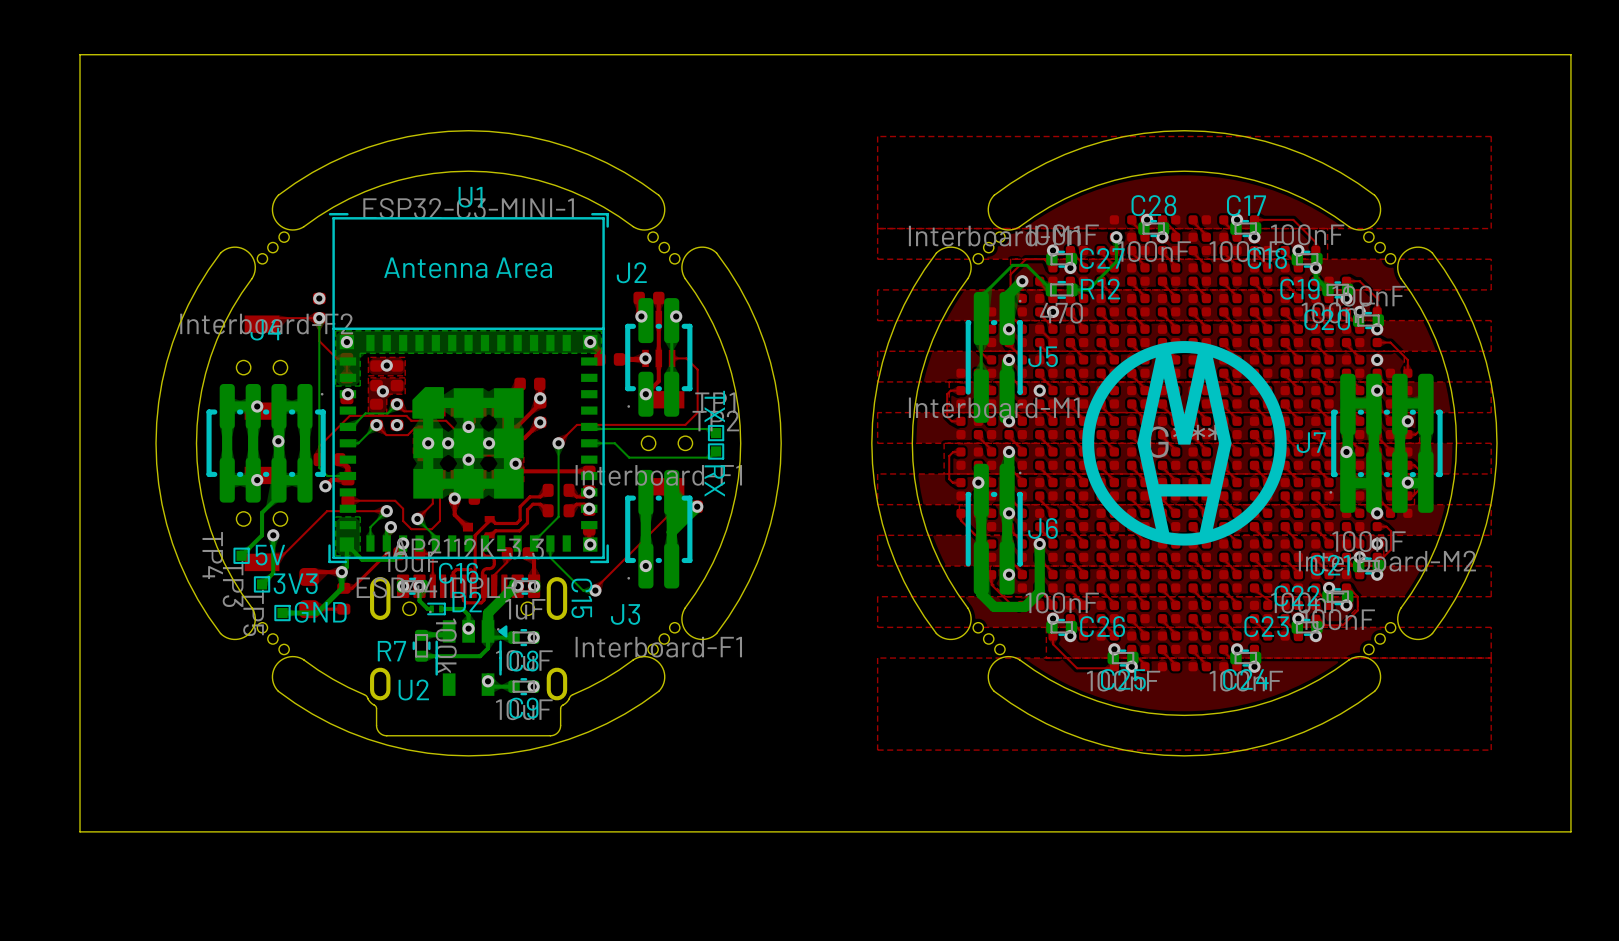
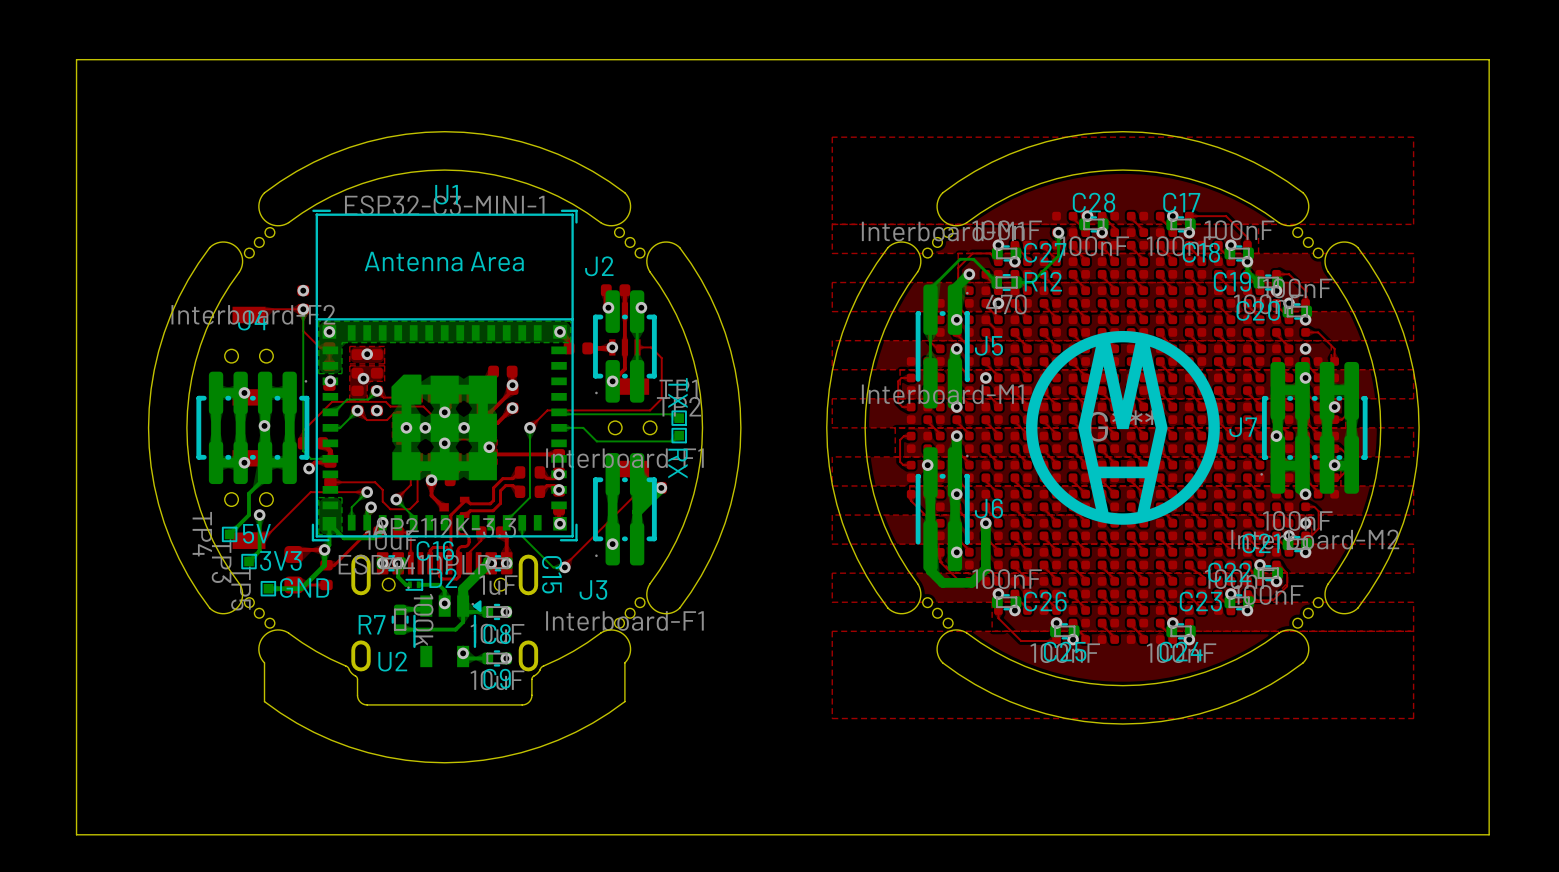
board edge: (658, 691) (606, 723) (569, 739) (509, 753) (468, 755) (407, 749) (368, 739) (312, 714) (278, 691) -> (624, 662) (624, 701) (592, 723) (557, 740) (521, 752) (483, 760) (444, 762) (406, 760) (368, 752) (331, 740) (296, 723) (264, 701) (264, 662)
board edge: (1570, 831) (80, 831) -> (1489, 796) (1489, 834) (76, 834) (76, 796)

